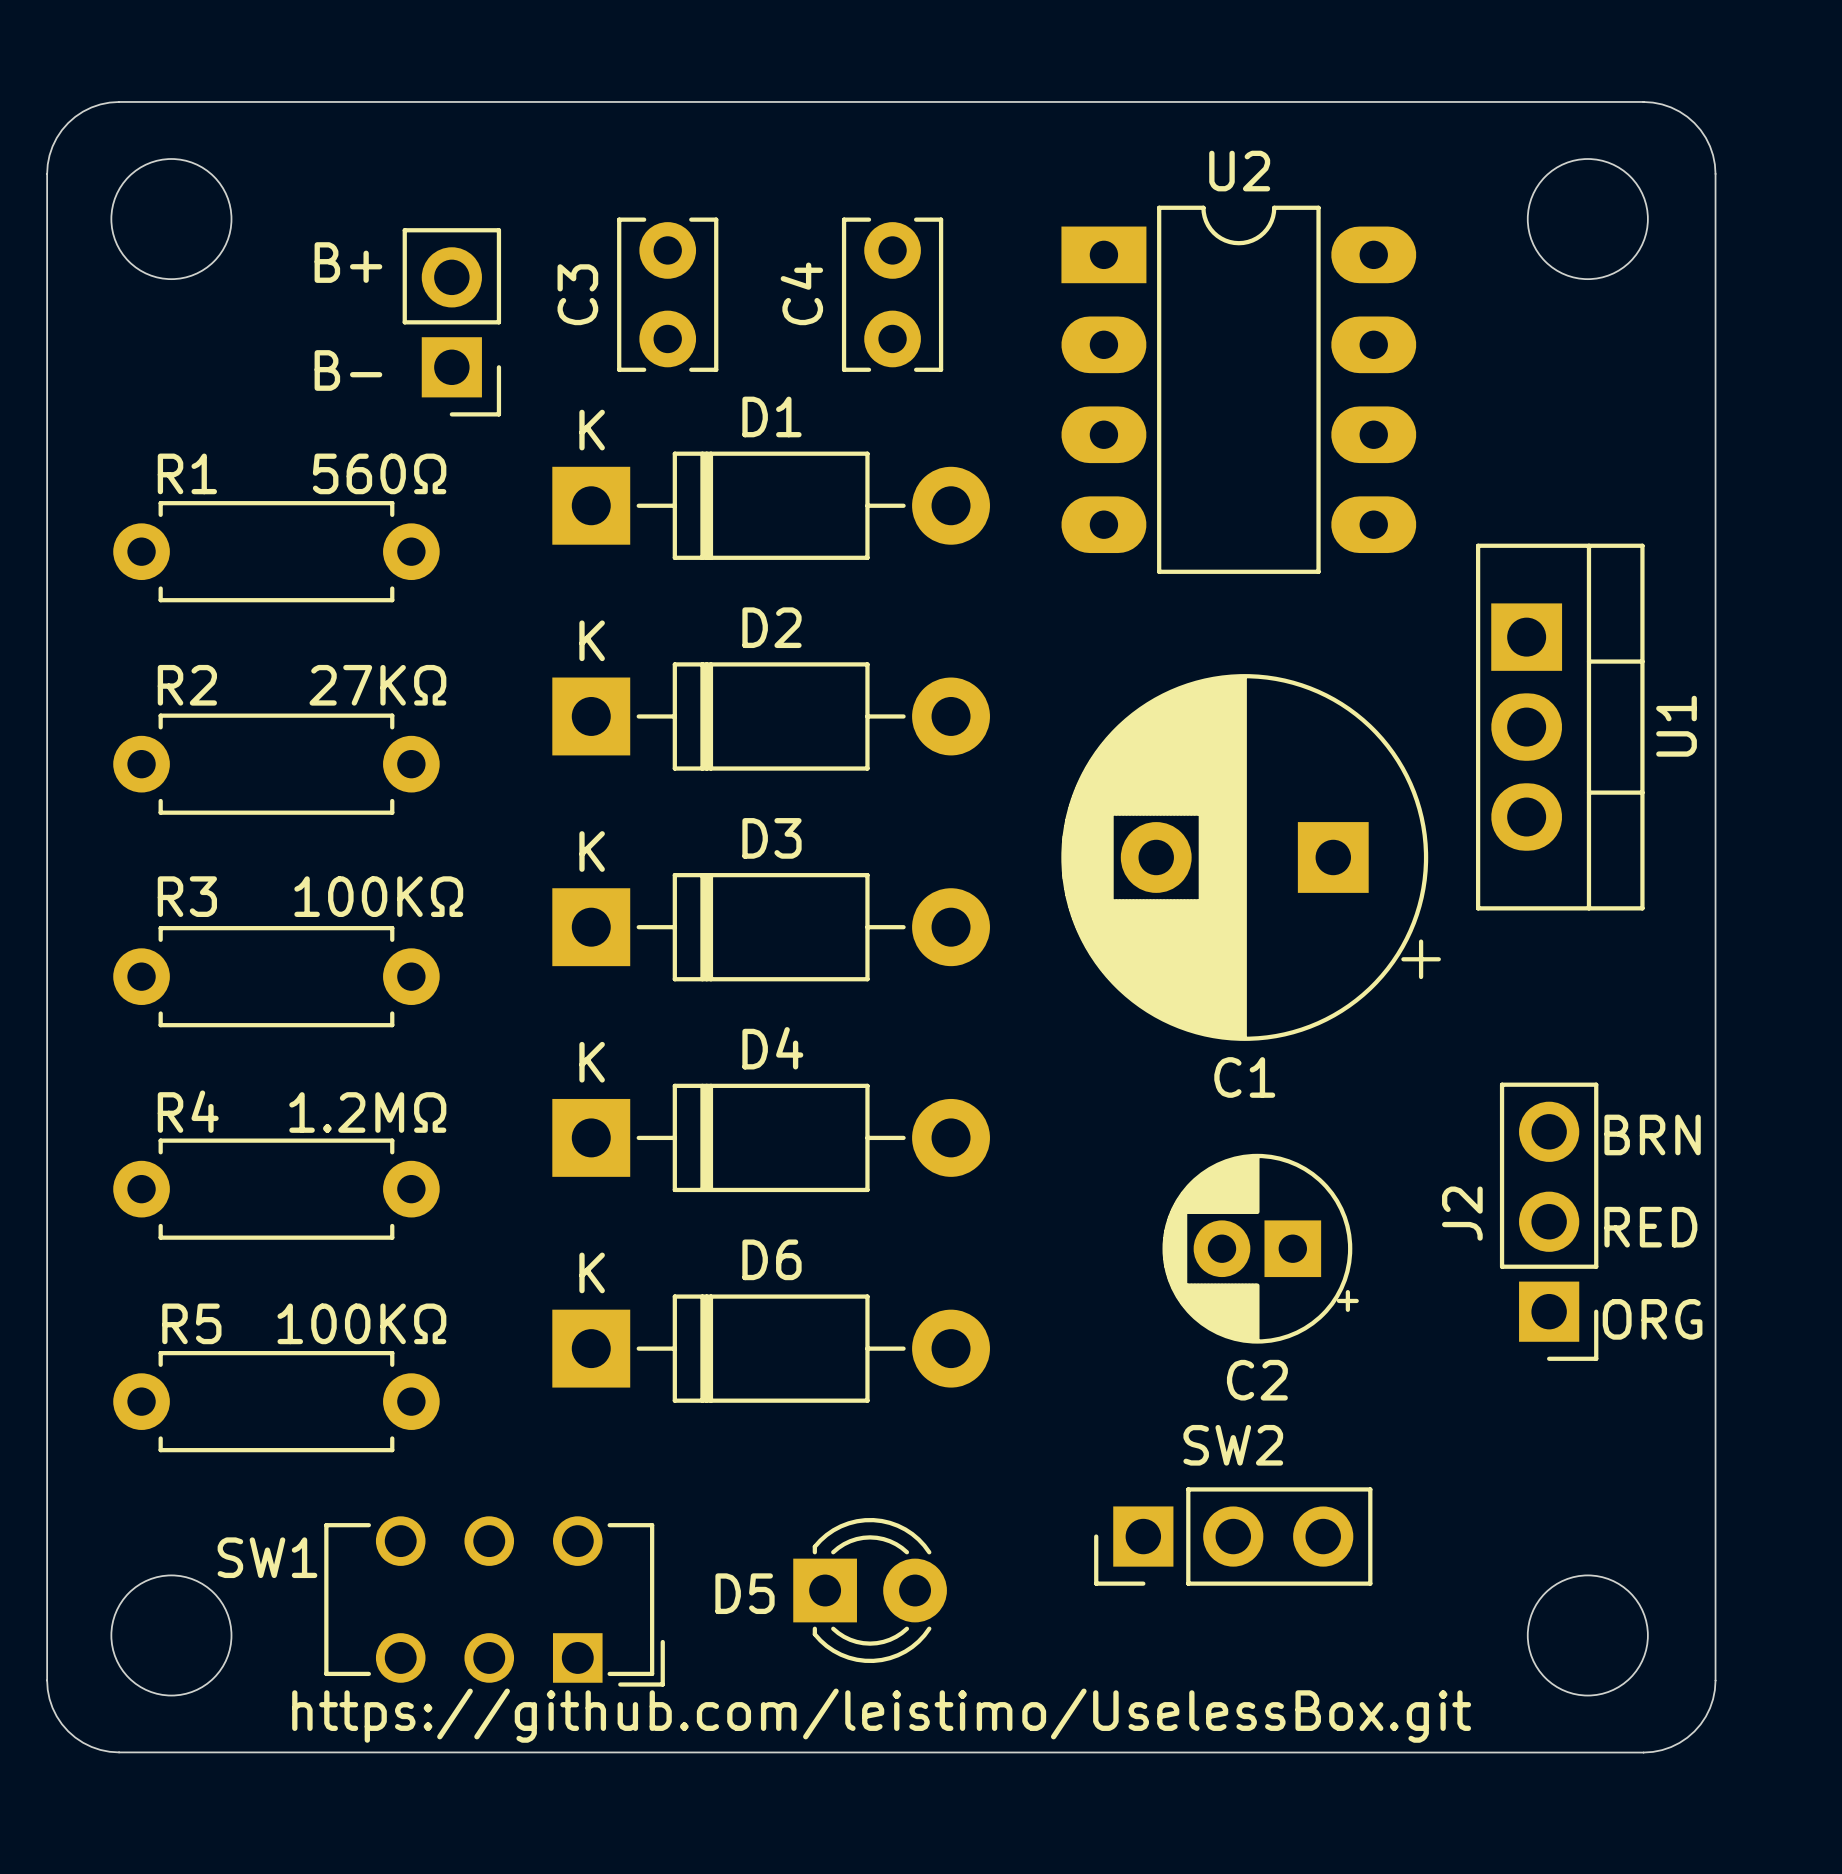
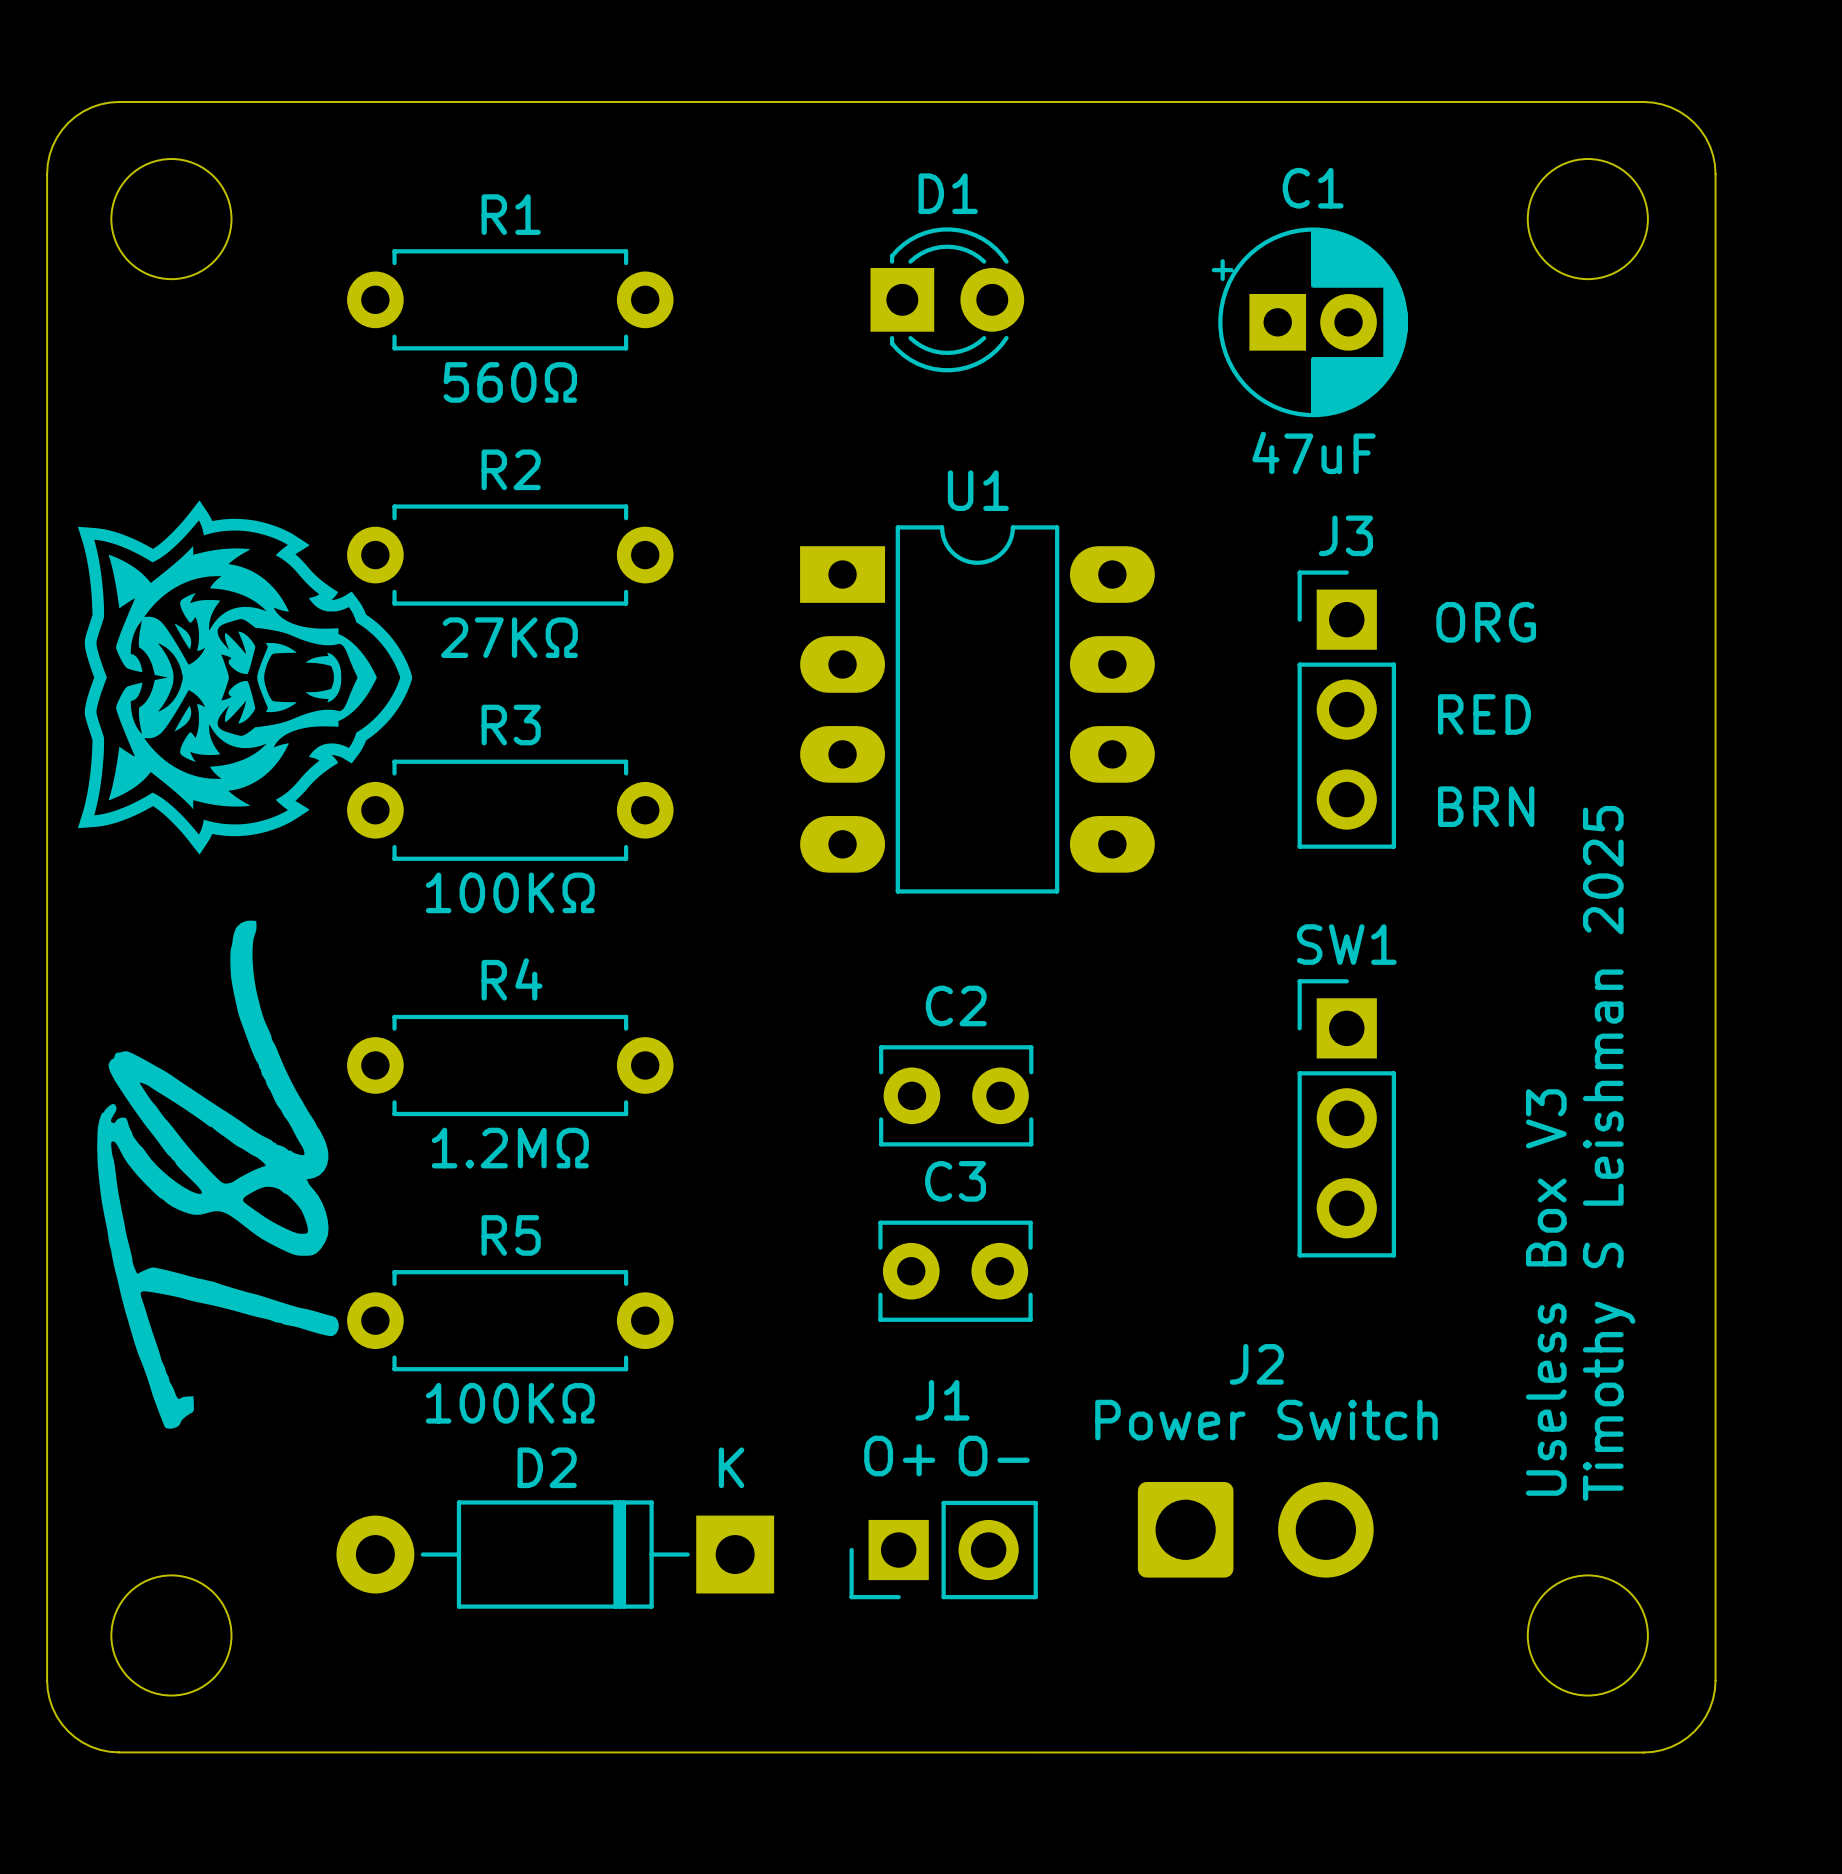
text: B+ (348, 262) -> none
C3 rotation: 0° (667, 294) -> 90° clockwise (955, 1271)
C3 position: (667, 294) -> (955, 1271)
C4: (892, 294) -> none
part: (451, 322) -> none
text: B- (348, 370) -> none
U2: (1238, 389) -> none
D1 footprint: [552, 451, 990, 560] -> [870, 227, 1025, 373]
C1 value: none -> 47uF (1313, 452)
R1 name position: R1 (187, 473) -> R1 (511, 214)
R1 value position: 560Ω (379, 473) -> 560Ω (510, 382)
drawing: none -> [77, 500, 413, 855]
U1 footprint: [1475, 543, 1645, 911] -> [800, 525, 1155, 894]
R1 position: (276, 551) -> (510, 299)
D2 footprint: [552, 662, 990, 771] -> [336, 1500, 775, 1609]
C1 footprint: [1061, 674, 1441, 1041] -> [1211, 227, 1409, 418]
R2 name position: R2 (187, 685) -> R2 (511, 469)
R2 value position: 27KΩ (377, 685) -> 27KΩ (509, 637)
J3: none -> (1346, 709)
U1 name position: U1 (1676, 726) -> U1 (978, 490)
R2 position: (276, 764) -> (510, 555)
R3 name position: R3 (187, 896) -> R3 (511, 725)
R3 value position: 100KΩ (378, 896) -> 100KΩ (510, 892)
drawing: none -> [97, 920, 339, 1429]
D3: (771, 927) -> none
R3 position: (276, 976) -> (510, 810)
C1 name position: C1 (1244, 1077) -> C1 (1313, 188)
J2 footprint: [1499, 1082, 1599, 1361] -> [1137, 1481, 1374, 1578]
R4 name position: R4 (188, 1111) -> R4 (512, 979)
R4 value position: 1.2MΩ (367, 1112) -> 1.2MΩ (510, 1148)
text position: BRN (1652, 1134) -> BRN (1486, 806)
D4: (771, 1137) -> none
C2 footprint: [1162, 1153, 1359, 1344] -> [879, 1045, 1034, 1147]
text: none -> Timothy S Leishman 2025 (1609, 1153)
R4 position: (276, 1189) -> (510, 1065)
J2 name position: J2 (1462, 1213) -> J2 (1256, 1364)
text position: RED (1650, 1227) -> RED (1484, 714)
text: none -> Useless Box V3 (1546, 1292)
text position: ORG (1652, 1319) -> ORG (1486, 622)
R5 name position: R5 (191, 1323) -> R5 (511, 1235)
R5 value position: 100KΩ (361, 1323) -> 100KΩ (510, 1403)
D6: (771, 1348) -> none
C2 name position: C2 (1257, 1380) -> C2 (956, 1005)
R5 position: (276, 1401) -> (510, 1320)
text: none -> Power Switch (1266, 1420)
text: none -> O+ (899, 1456)
text: none -> O- (994, 1456)
SW1 footprint: [324, 1516, 665, 1687] -> [1297, 979, 1396, 1258]
SW2: (1233, 1536) -> none
J1: none -> (943, 1550)
SW1 name position: SW1 (267, 1557) -> SW1 (1346, 944)
D5: (870, 1590) -> none
text: https://github.com/leistimo/UselessBox.git (881, 1715) -> none

